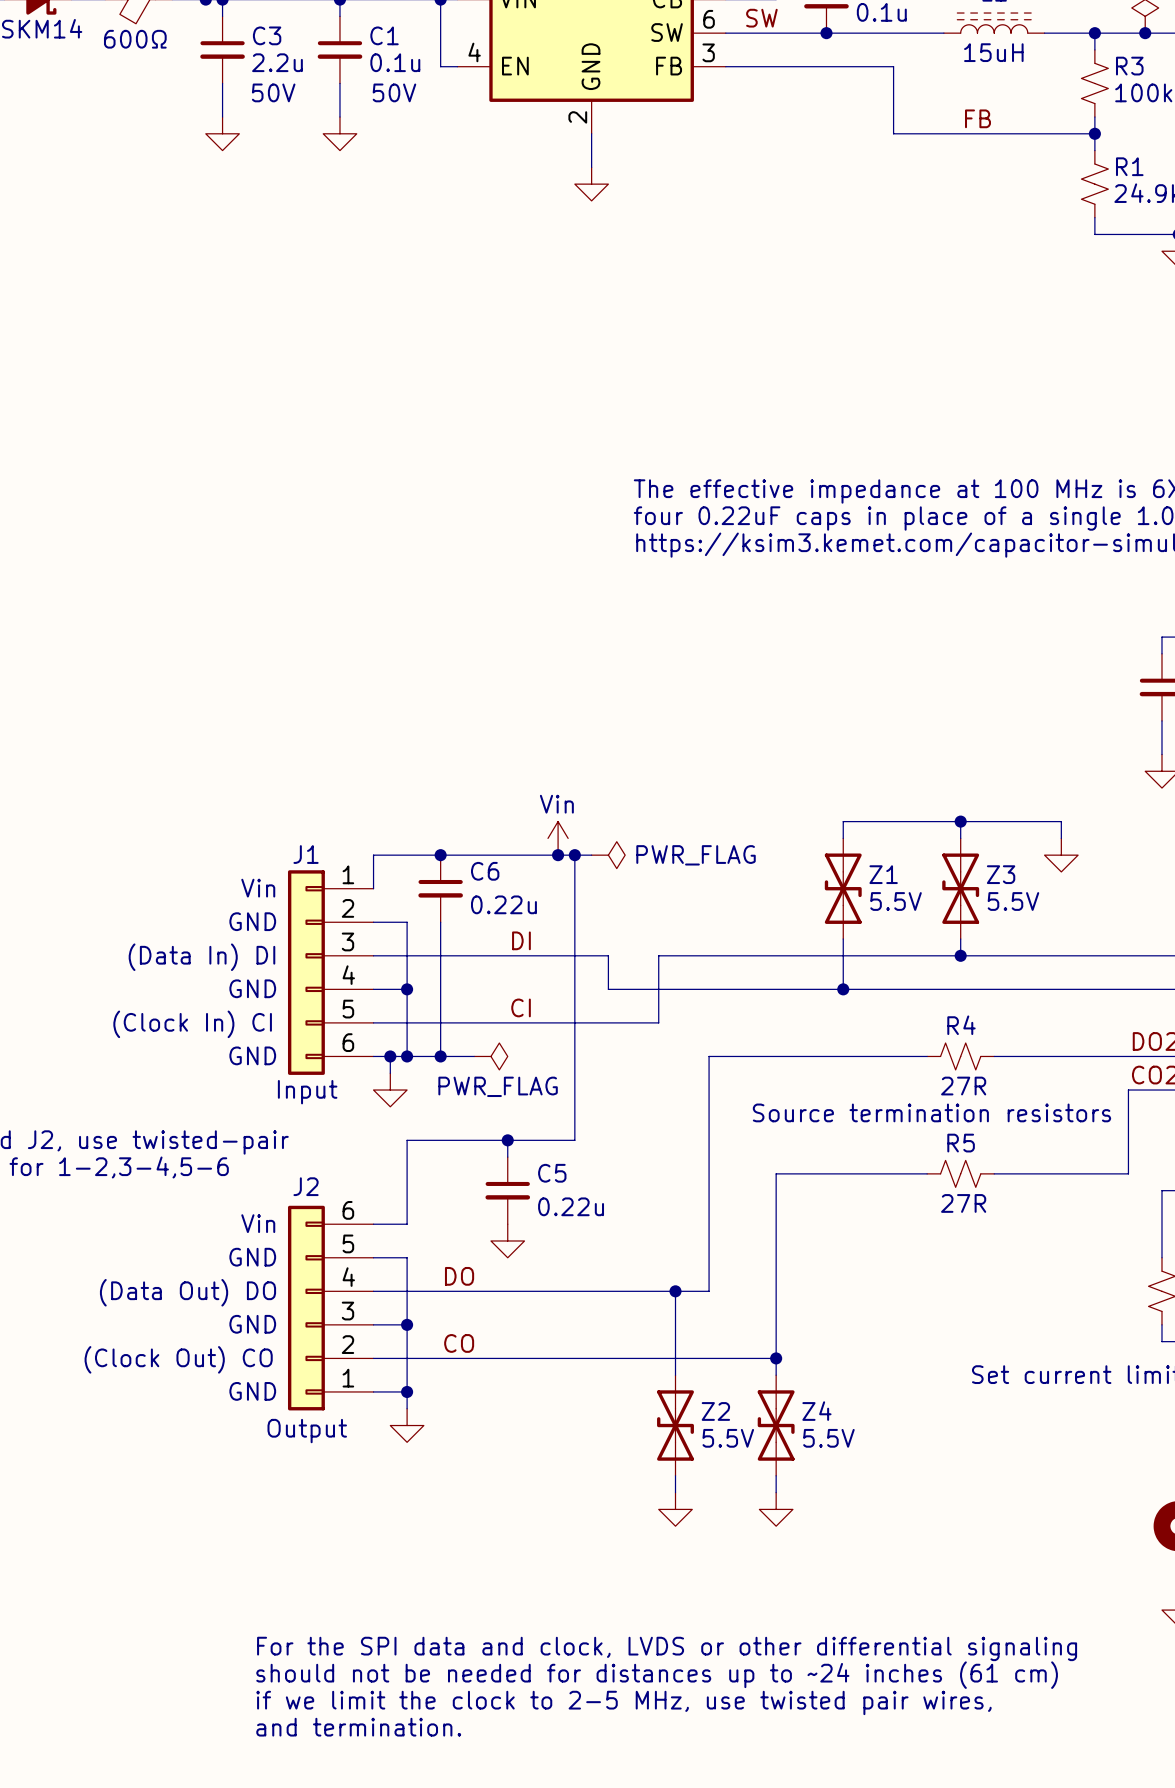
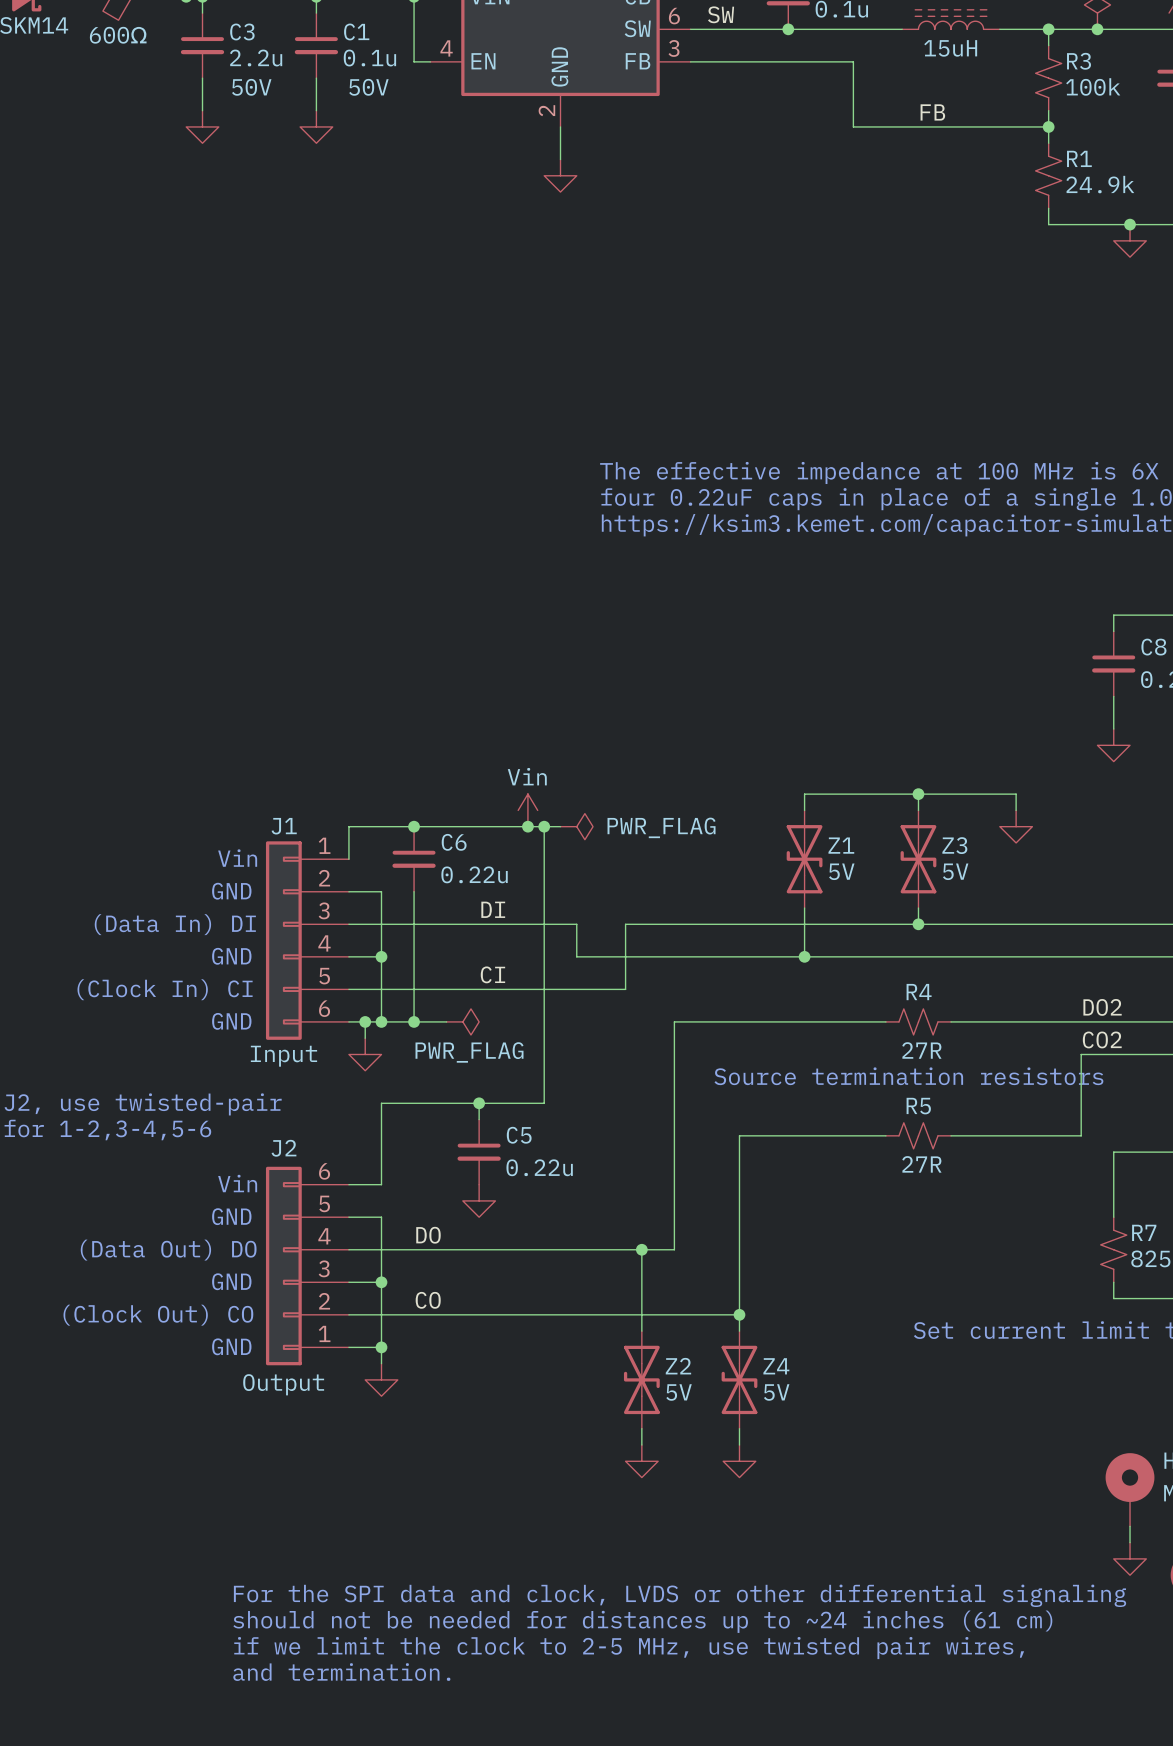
Z1 value: 5.5V (896, 901) -> 5V (841, 871)
Z3 value: 5.5V (1013, 901) -> 5V (955, 871)
Z2 value: 5.5V (728, 1438) -> 5V (679, 1392)
Z4 value: 5.5V (828, 1438) -> 5V (776, 1392)

